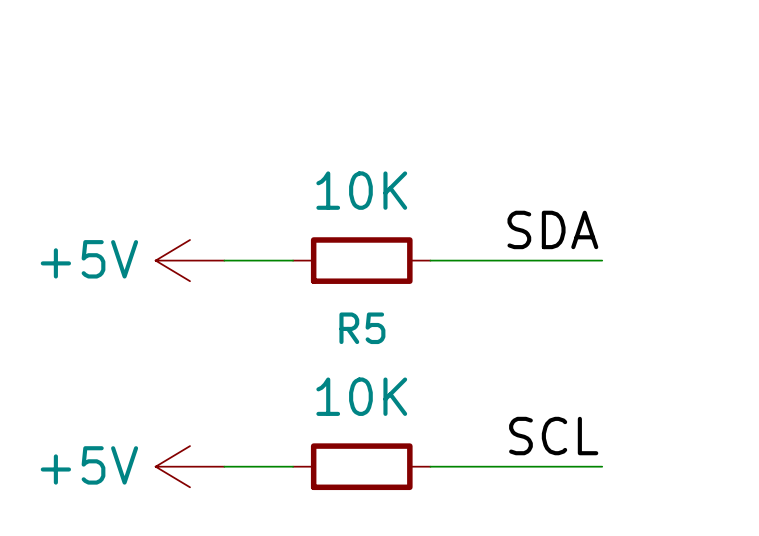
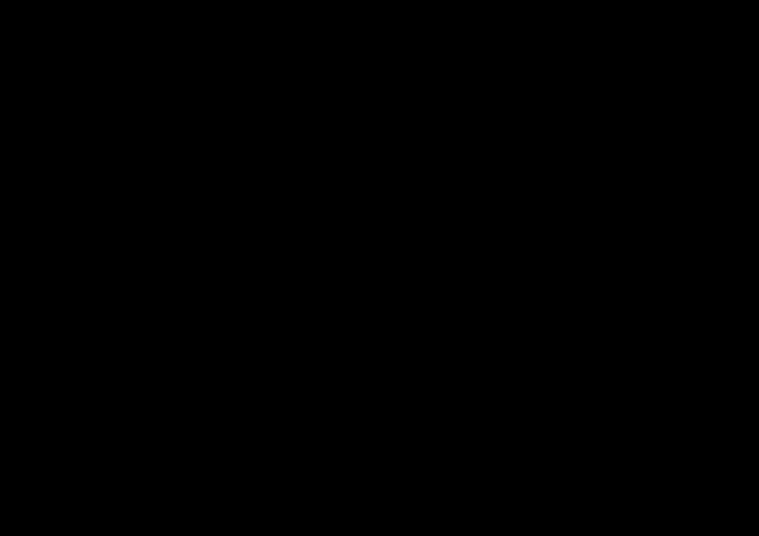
label: SDA (552, 229) -> none
power symbol: +5V (190, 260) -> none
wire: (224, 260) (293, 260) -> none
part: 10K (361, 260) -> none
wire: (430, 260) (602, 260) -> none
label: SCL (553, 436) -> none
power symbol: +5V (190, 466) -> none
wire: (224, 466) (293, 466) -> none
R5: 10K (361, 466) -> none
wire: (430, 466) (602, 466) -> none

